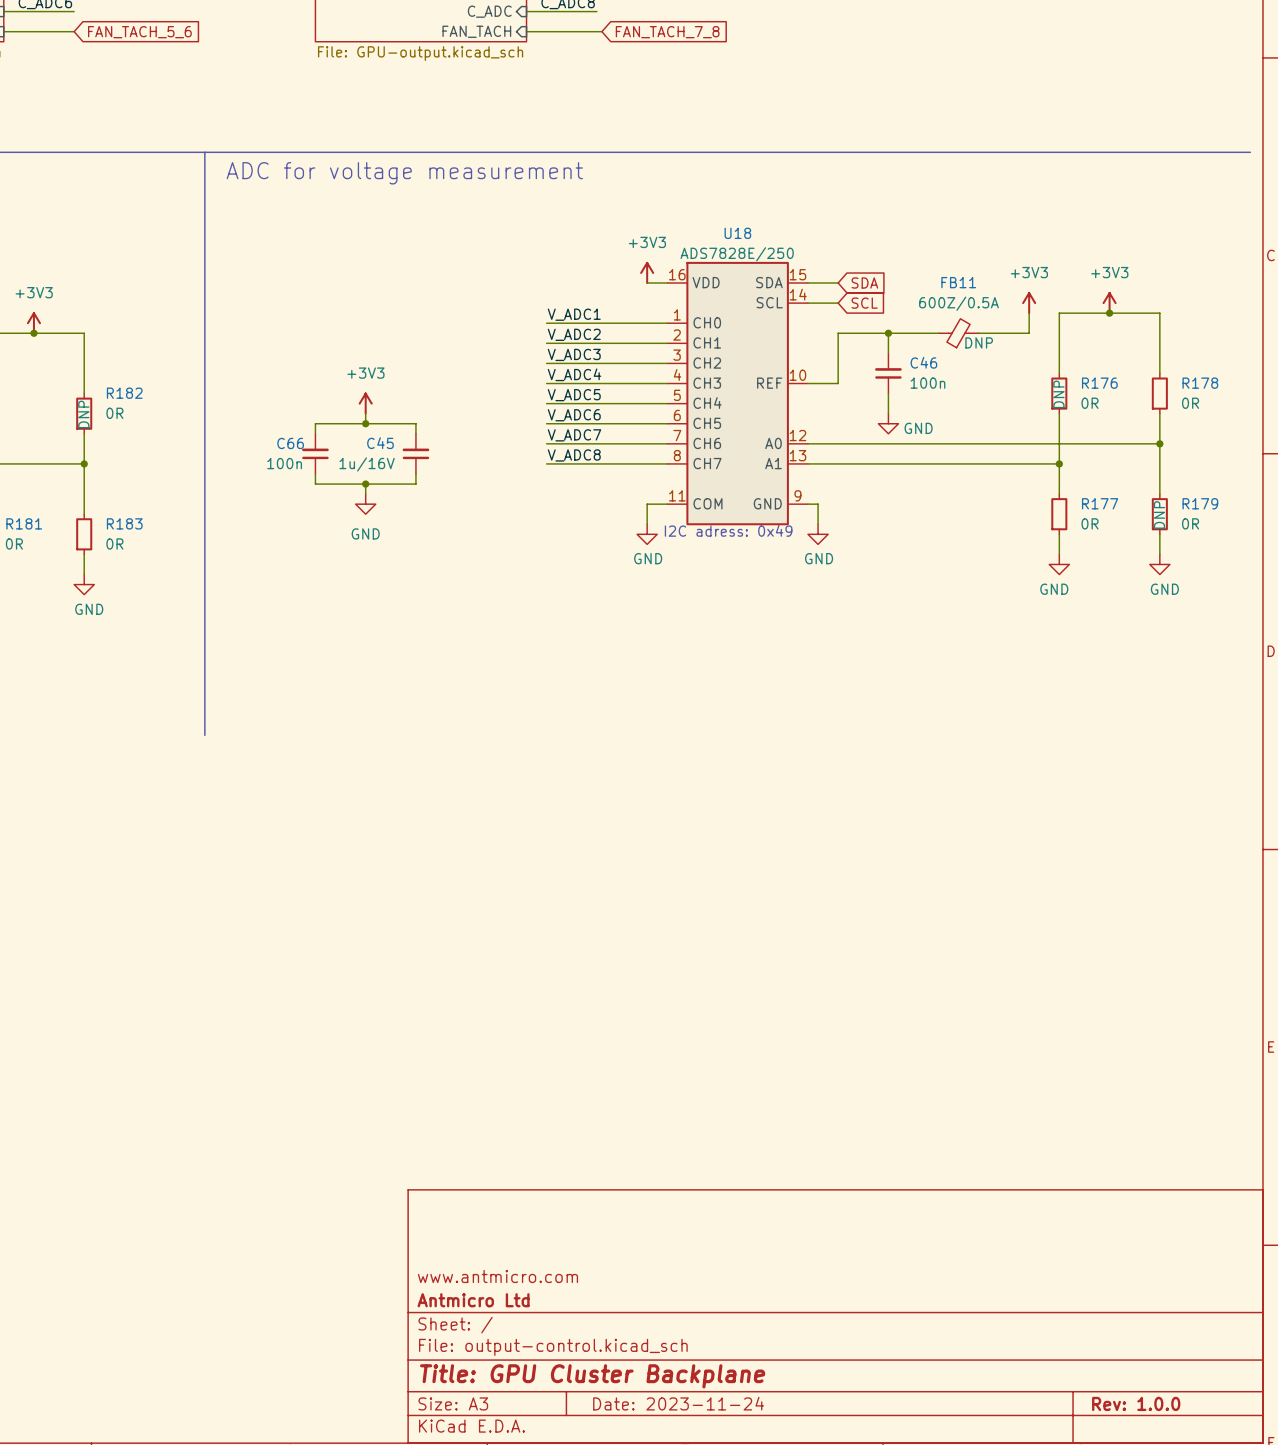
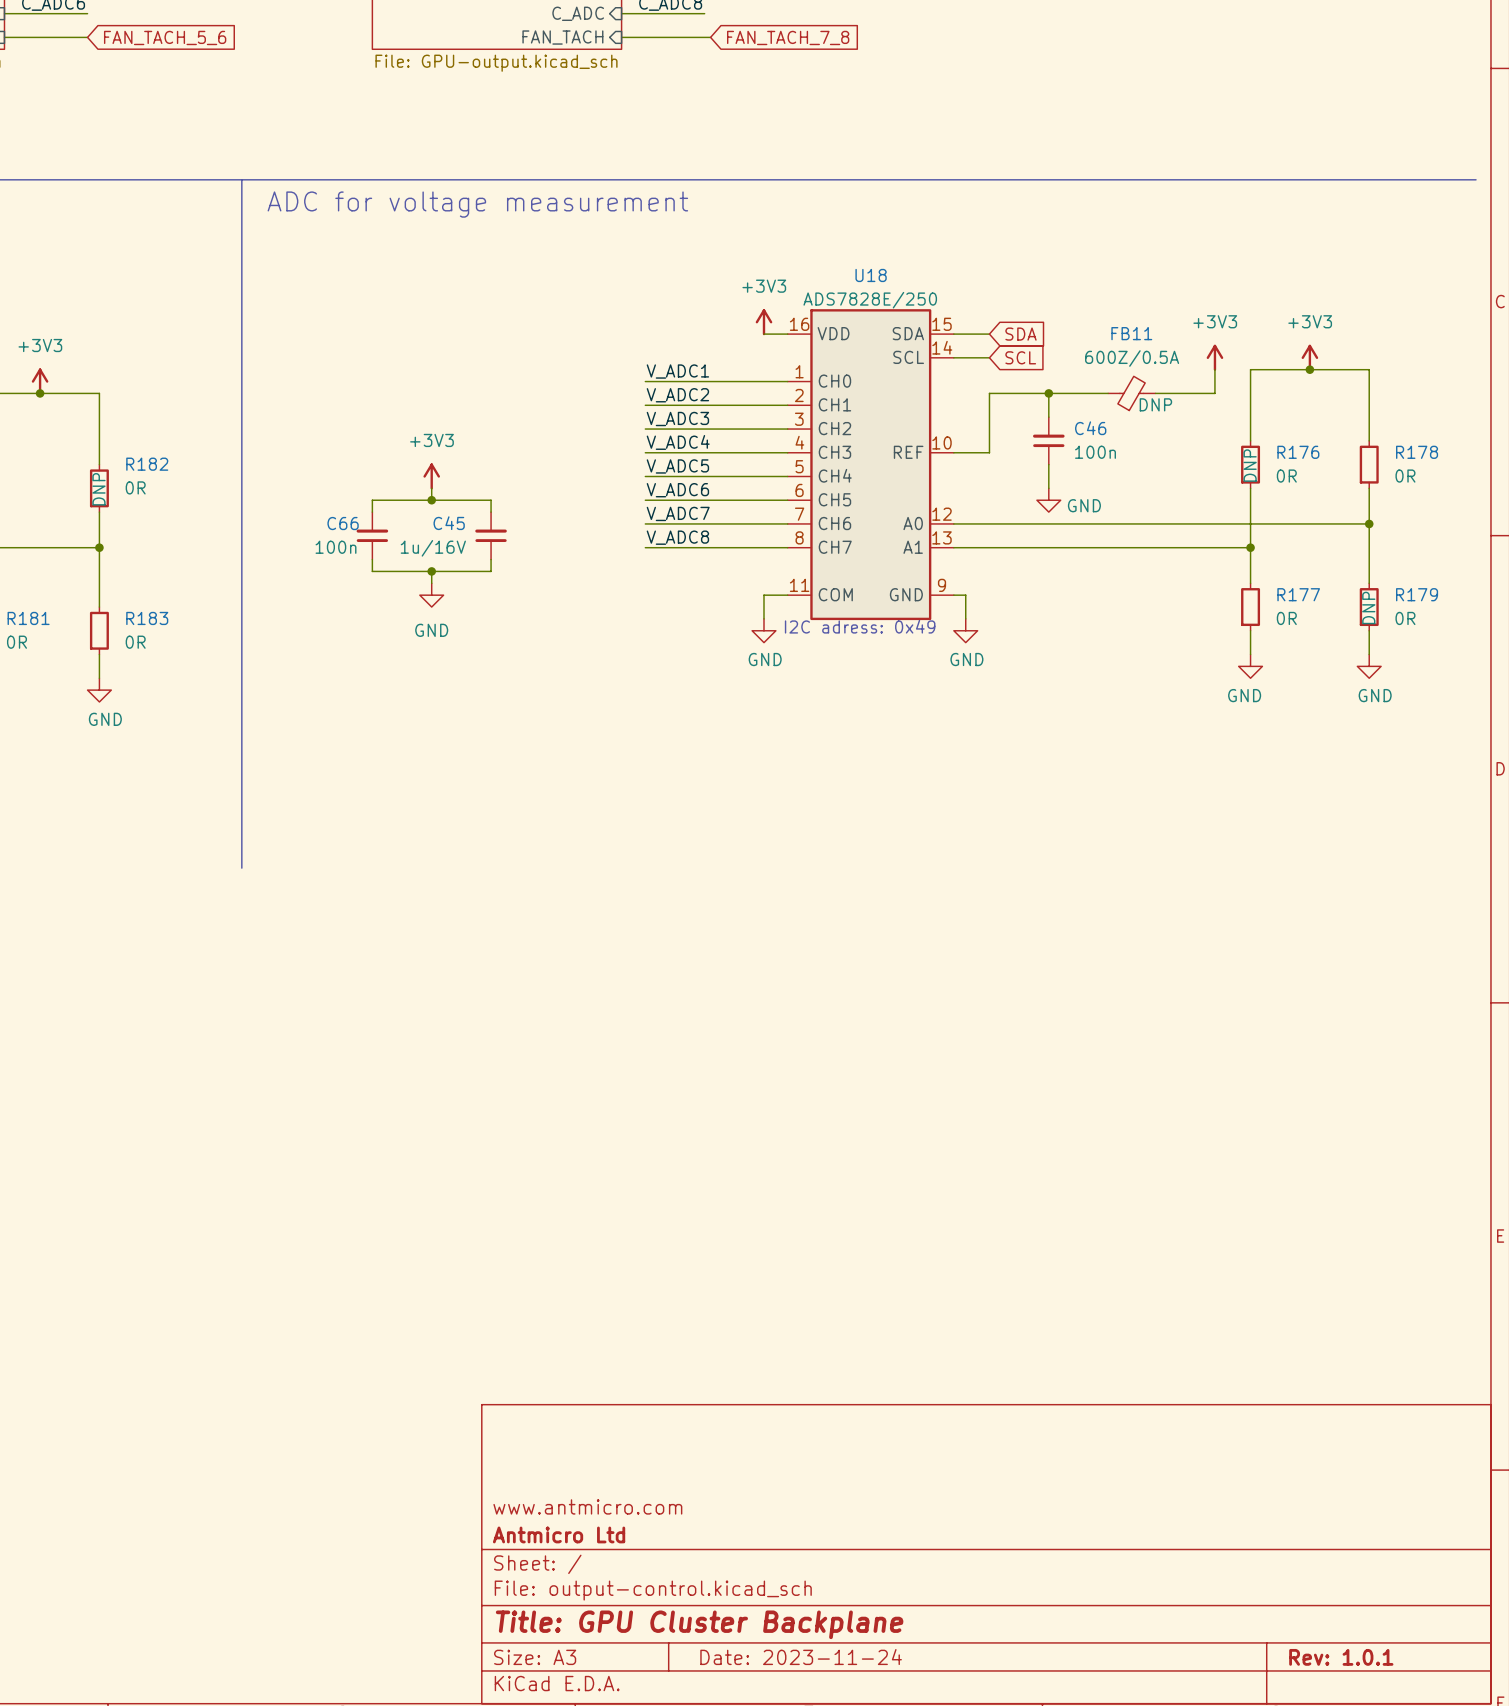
title block: Rev: 1.0.0 (1136, 1403) -> Rev: 1.0.1 (1341, 1657)

